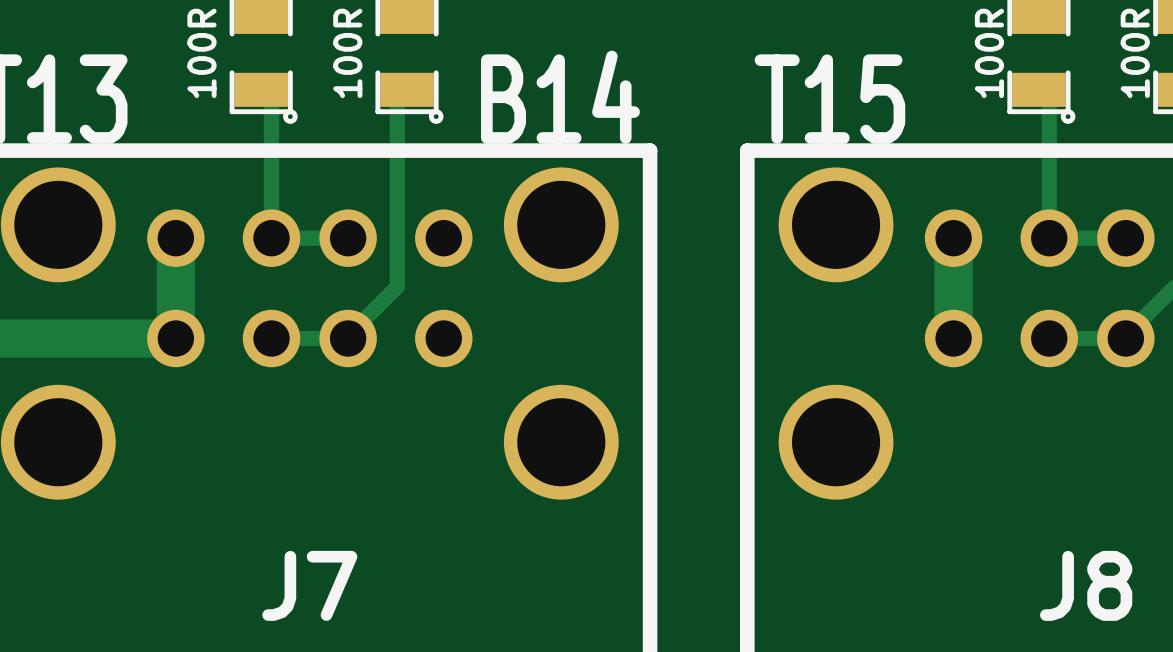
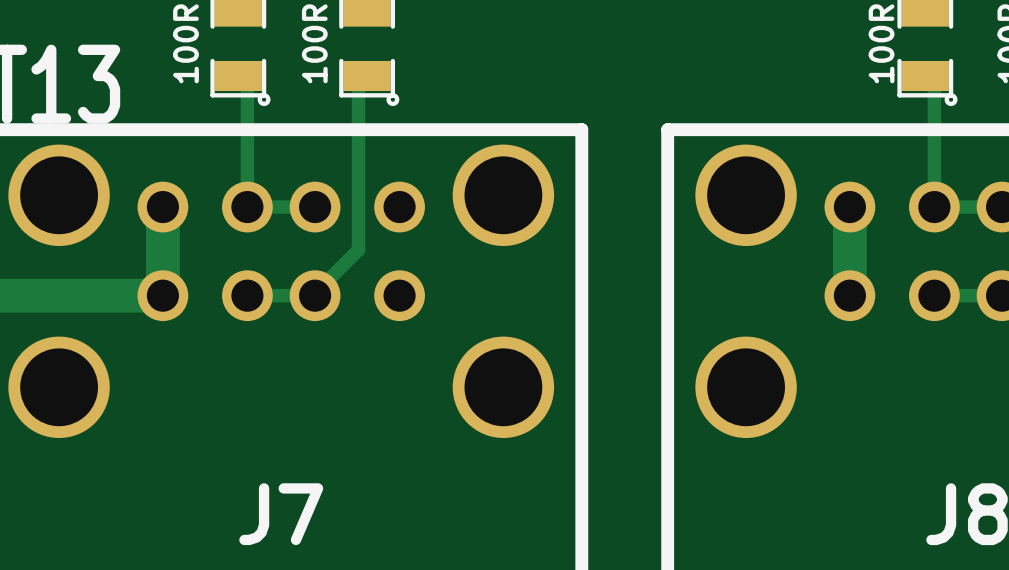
text: B14 (560, 97) -> none
text: T15 (829, 99) -> none

